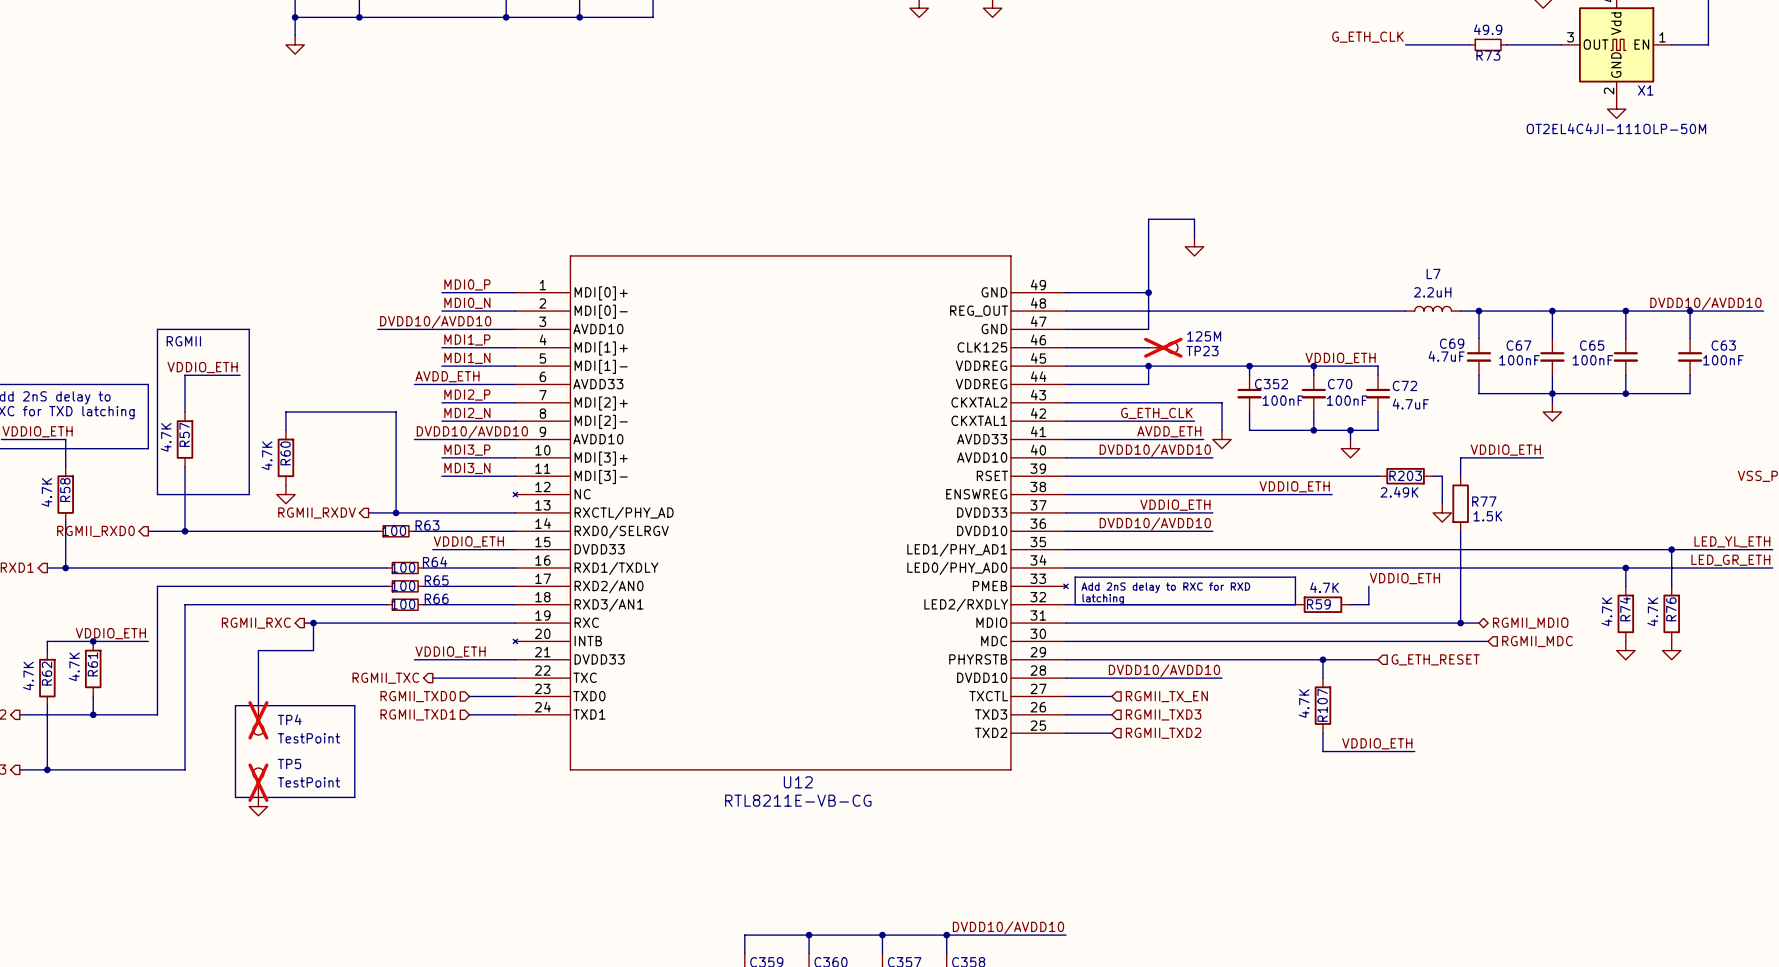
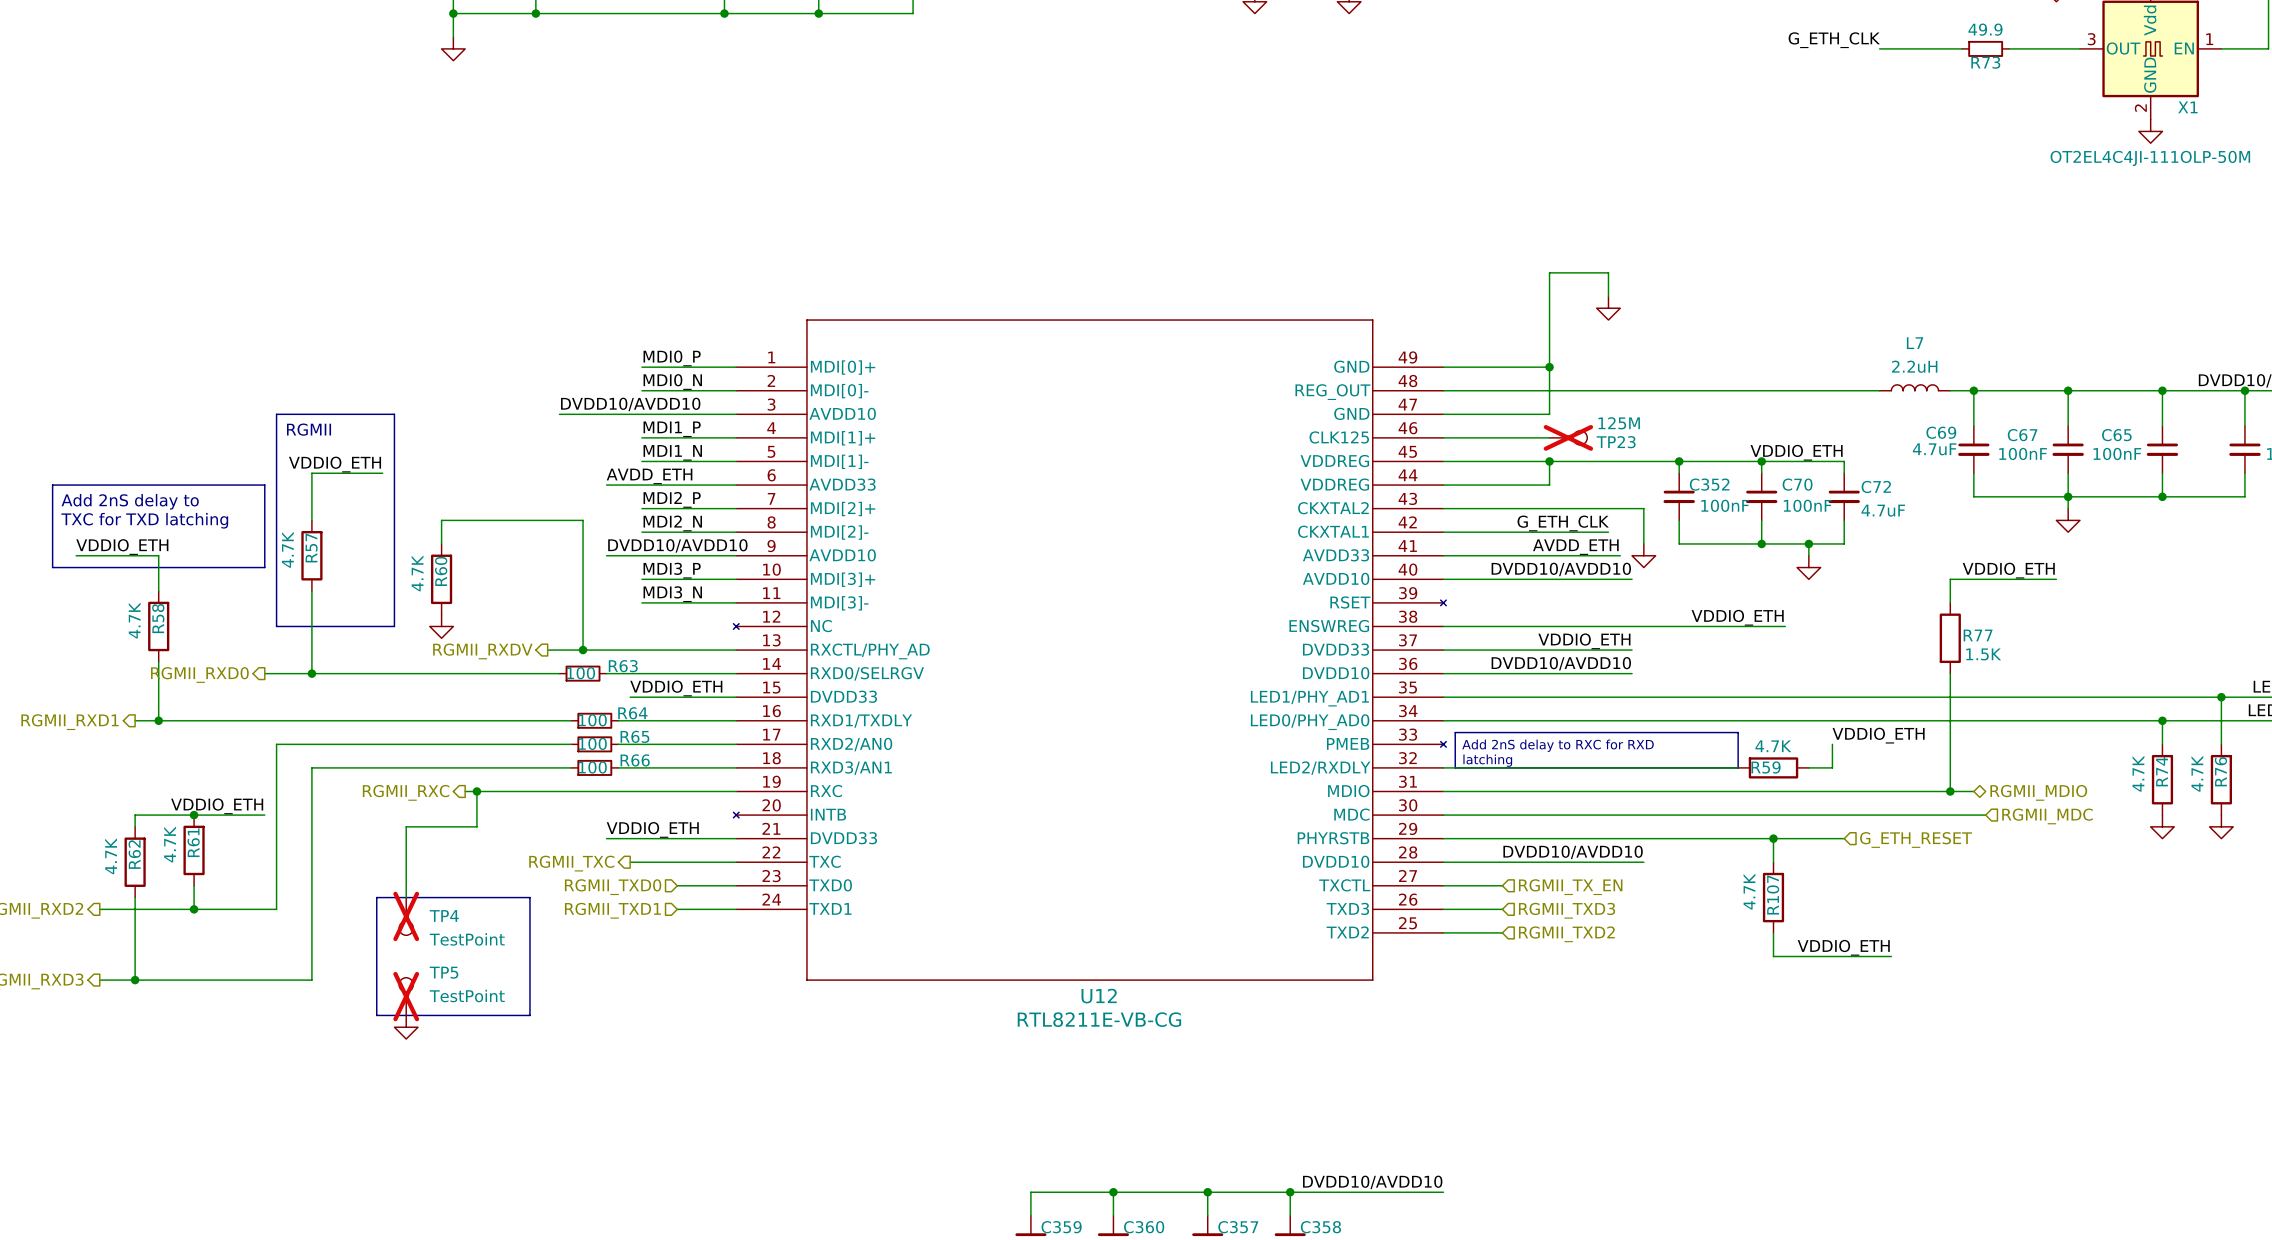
U12 symbol: [513, 255, 1069, 771] -> [733, 319, 1447, 981]
wire: (1066, 476) (1378, 476) -> none
R203: 2.49K (1405, 476) -> none
wire: (1433, 476) (1442, 476) (1442, 503) -> none
power symbol: (1442, 512) -> none

